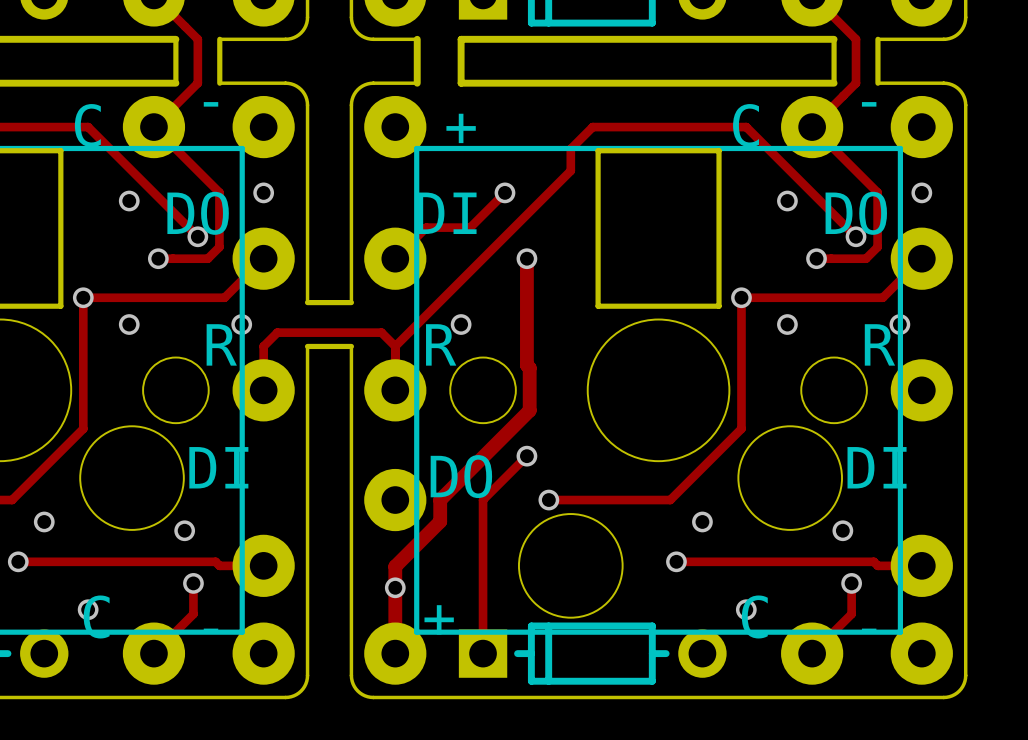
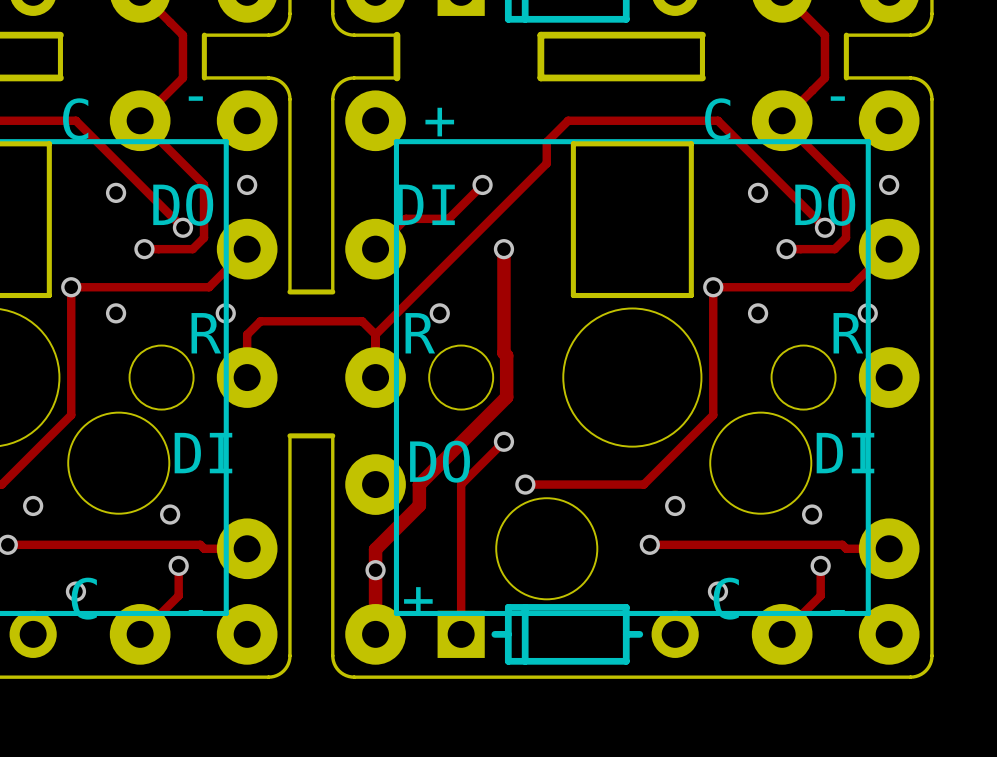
board edge: (72, 39) (175, 39) (175, 83) (72, 83) -> (60, 35) (60, 77)
board edge: (564, 39) (461, 39) (461, 83) (564, 83) -> (540, 35) (540, 77)
board edge: (730, 39) (834, 39) (834, 83) (730, 83) -> (702, 35) (702, 77)
board edge: (307, 450) (307, 346) (351, 346) (351, 450) -> (289, 435) (332, 435)

